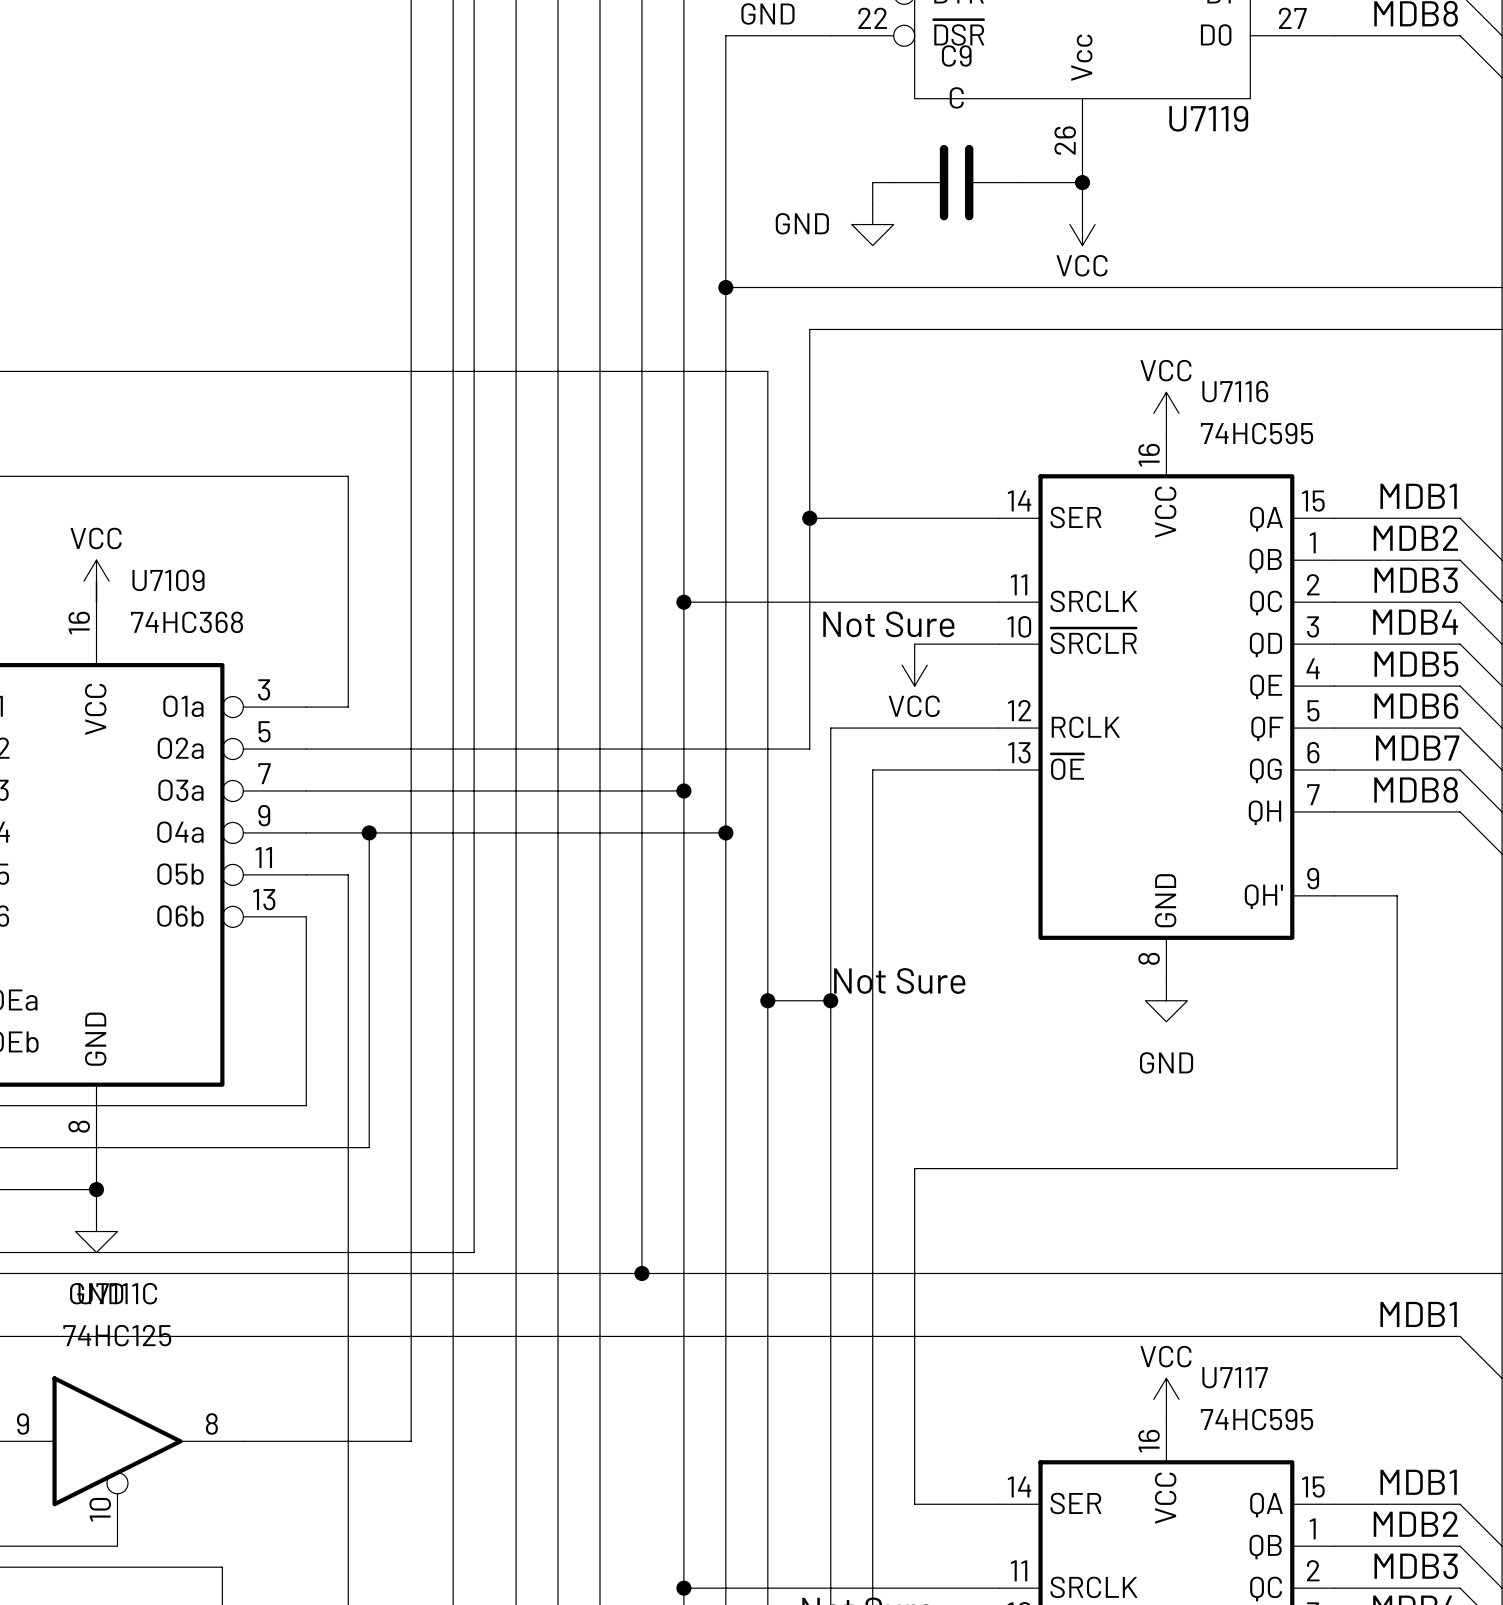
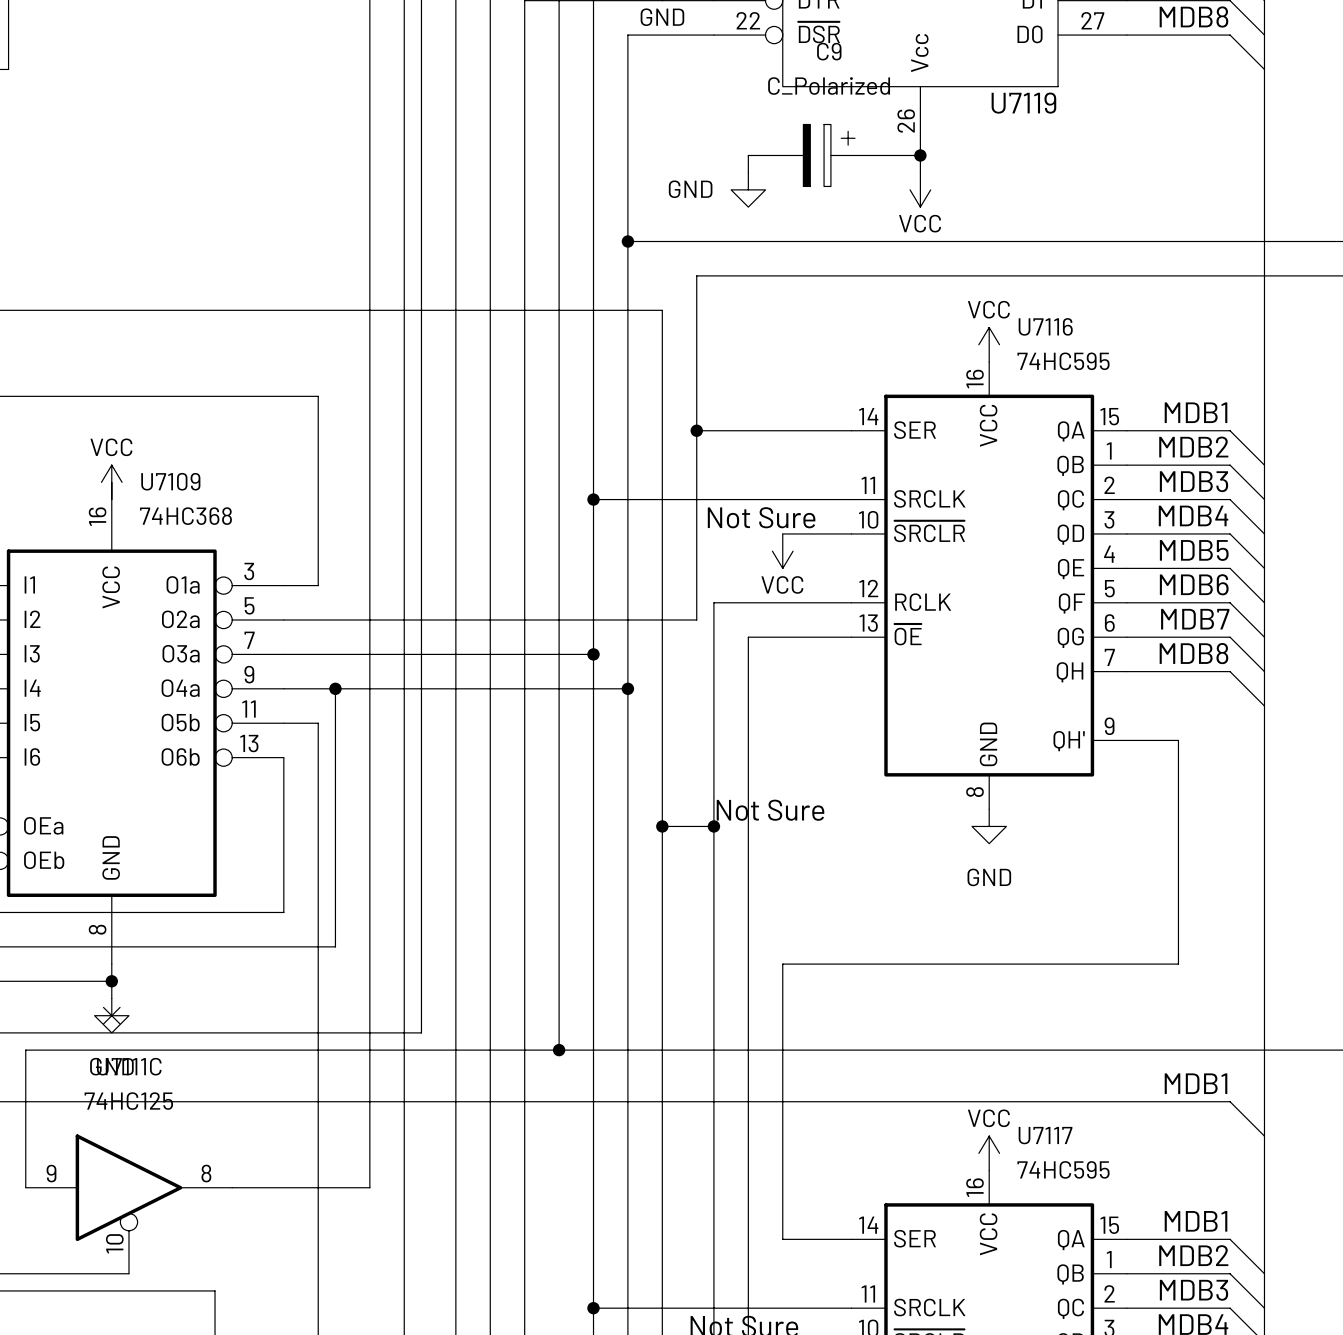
C9 value: C (956, 97) -> C_Polarized (829, 86)
C9 symbol: [893, 144, 1020, 221] -> [765, 124, 869, 187]
no-connect mark: none -> (111, 1015)

